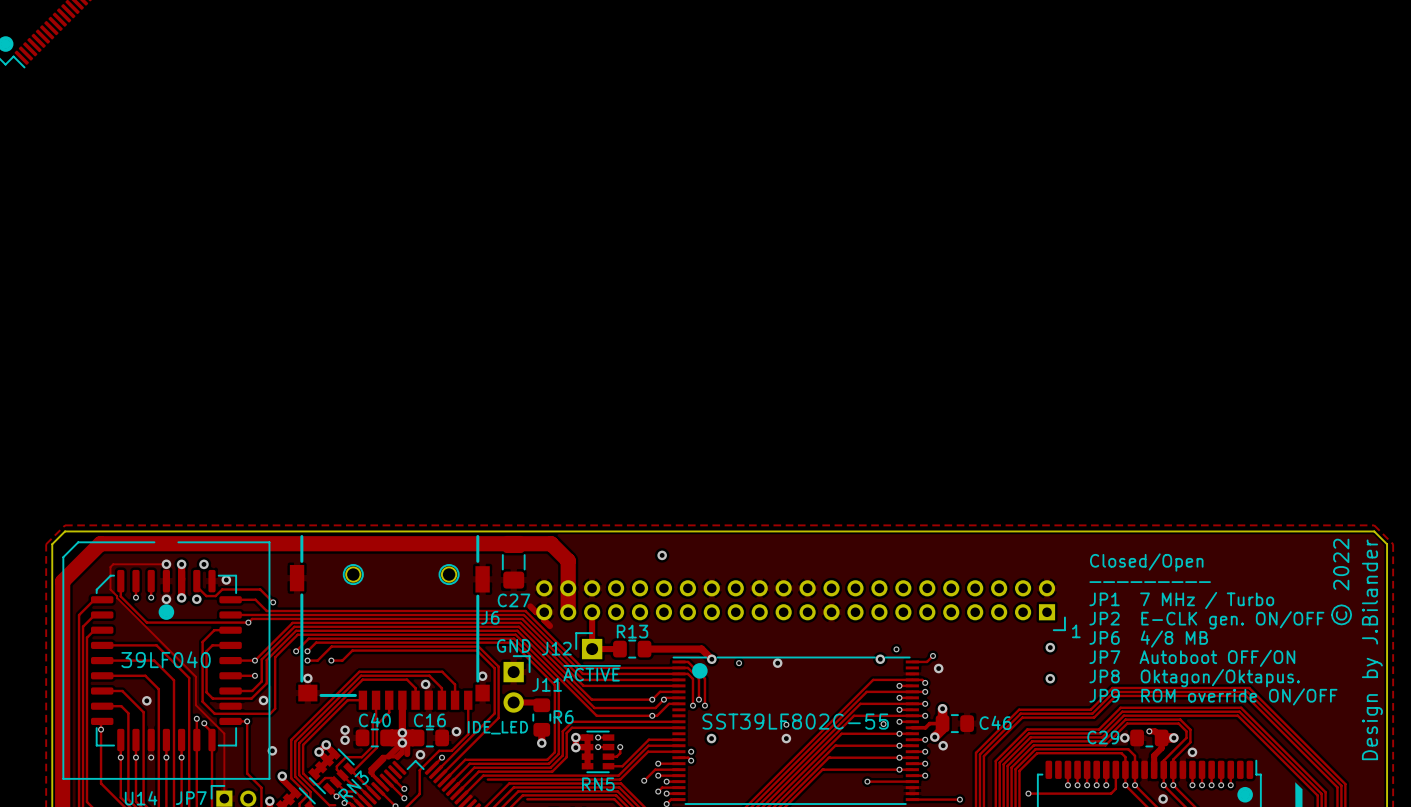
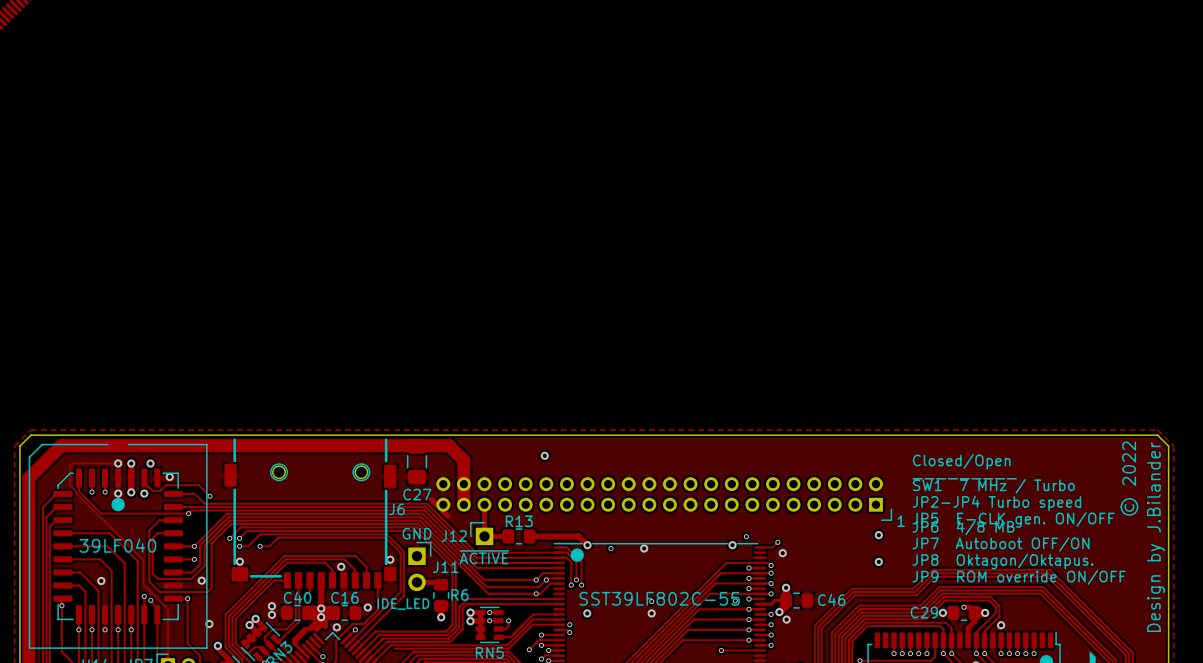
text: JP1 7 MHz / Turbo (1181, 600) -> SW1 7 MHz / Turbo (993, 486)
text: none -> JP2-JP4 Turbo speed (996, 503)
text: JP2 E-CLK gen. ON/OFF (1206, 620) -> JP5 E-CLK gen. ON/OFF (1013, 519)

